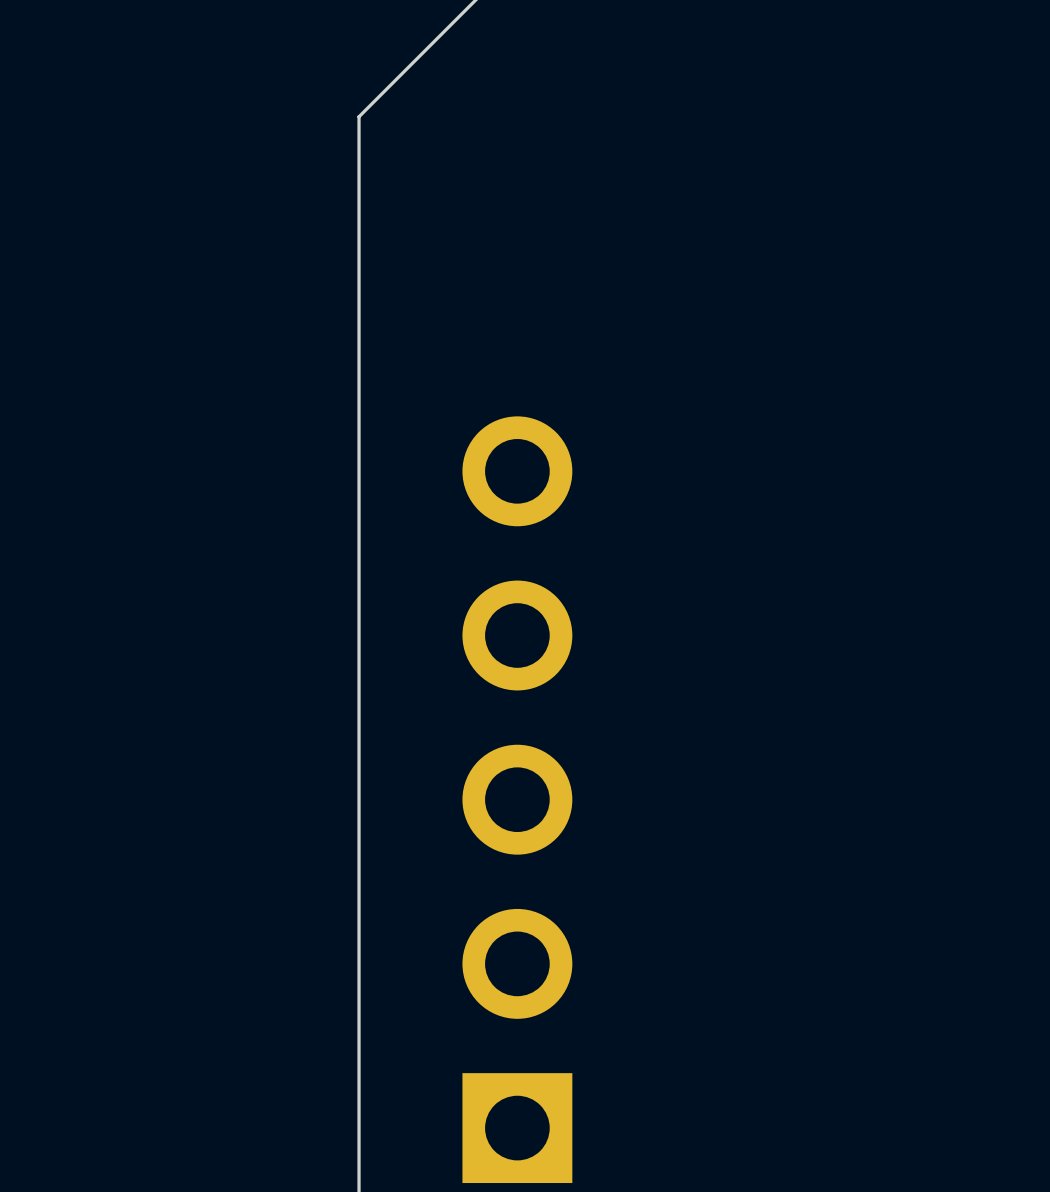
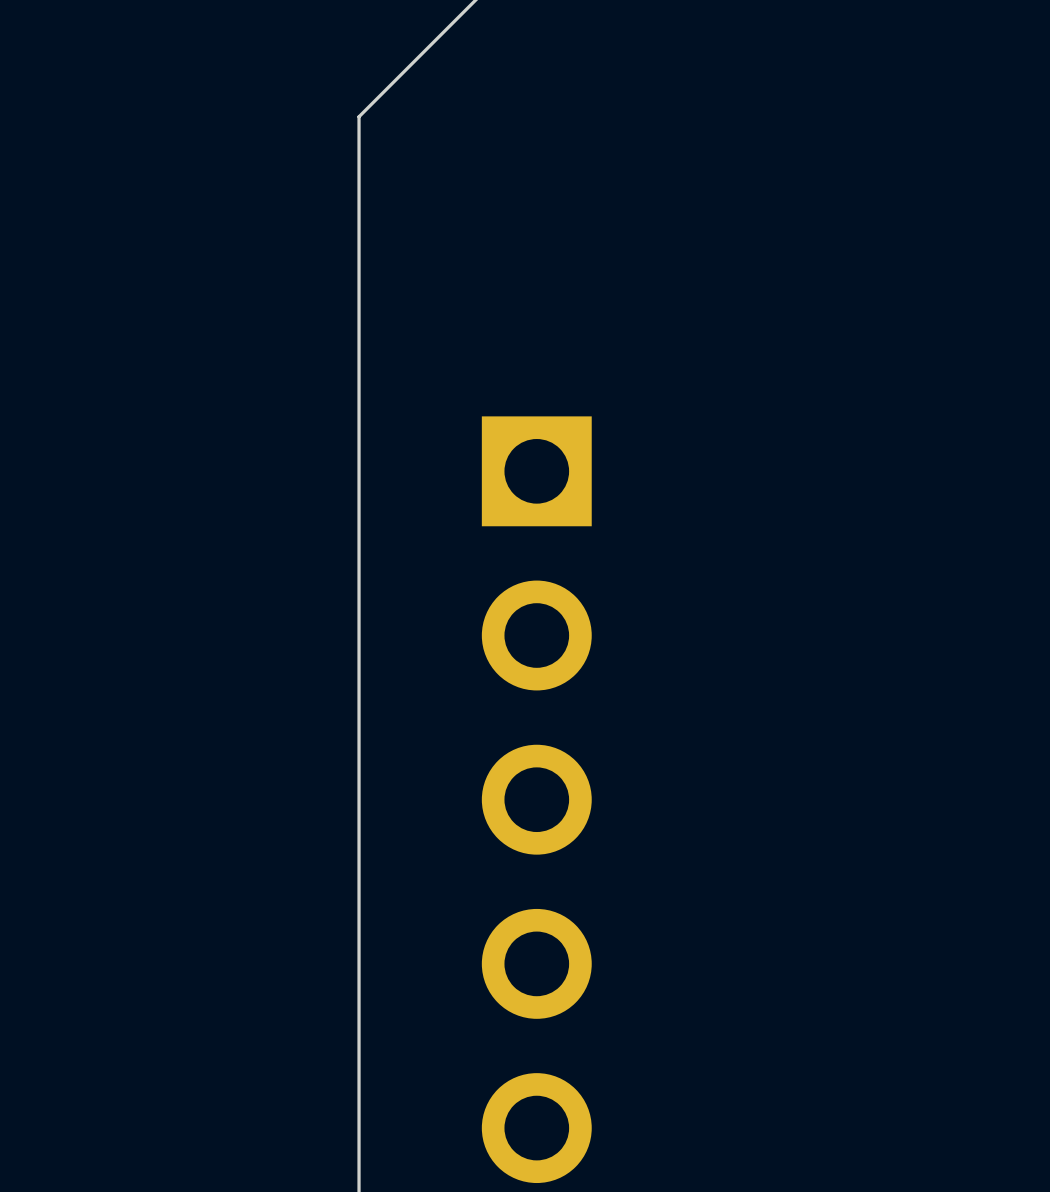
part rotation: 0° (517, 799) -> 180° (536, 799)

